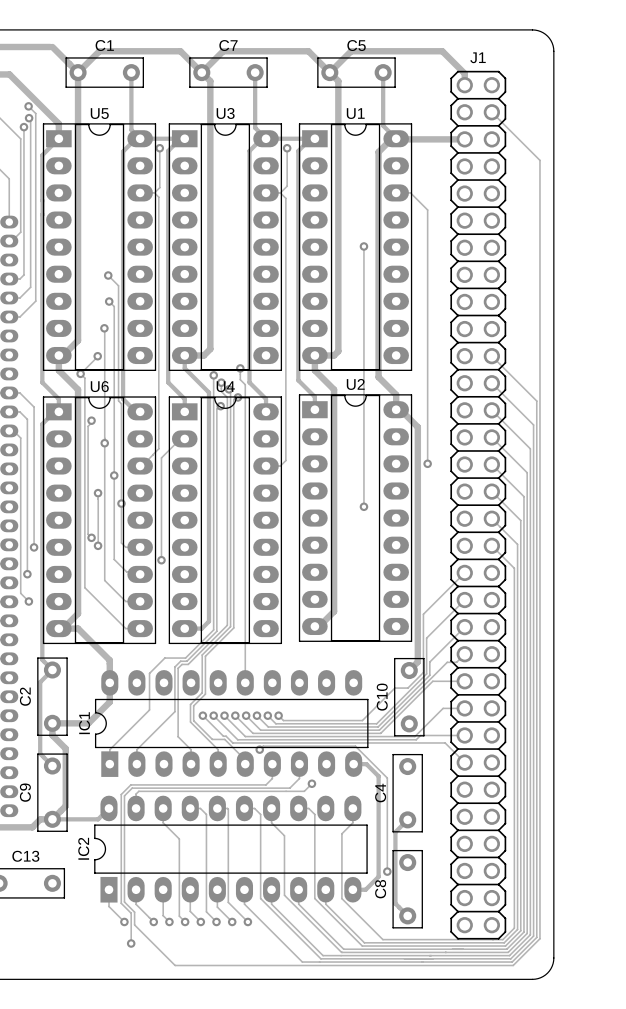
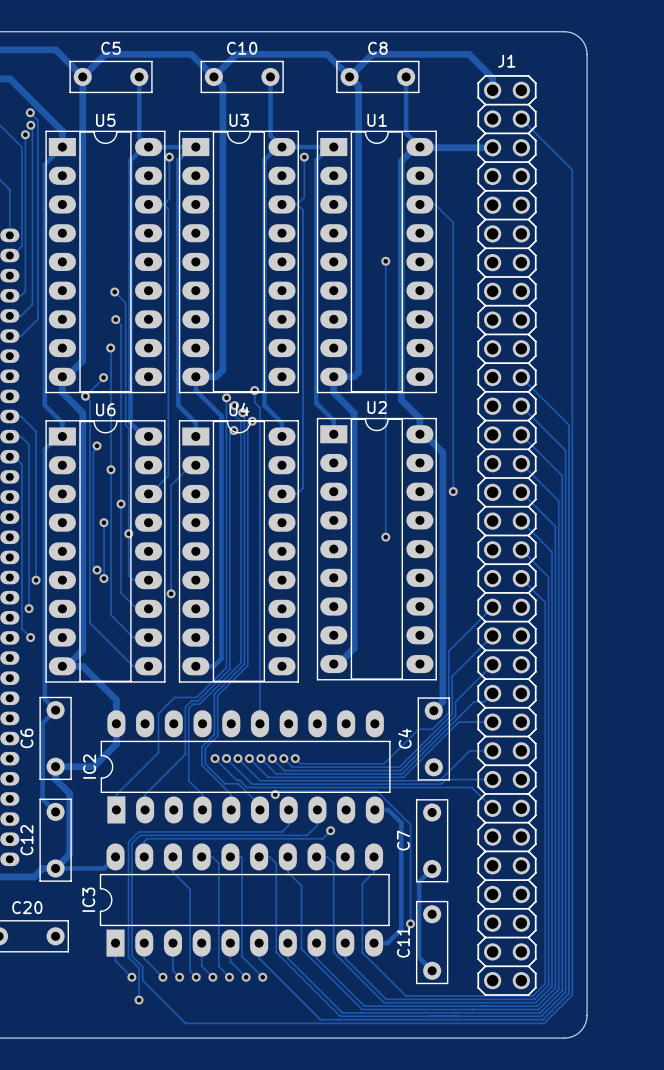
C1 name: C1 (104, 45) -> C5 (111, 48)
C7 name: C7 (228, 45) -> C10 (242, 48)
C5 name: C5 (356, 45) -> C8 (377, 48)
C2 name: C2 (25, 696) -> C6 (26, 738)
C10 name: C10 (382, 697) -> C4 (404, 738)
IC1 name: IC1 (84, 723) -> IC2 (89, 766)
C9 name: C9 (25, 792) -> C12 (26, 840)
C4 name: C4 (380, 793) -> C7 (403, 840)
IC2 name: IC2 (83, 848) -> IC3 (88, 899)
C13 name: C13 (25, 856) -> C20 (27, 907)
C8 name: C8 (380, 889) -> C11 (403, 942)

